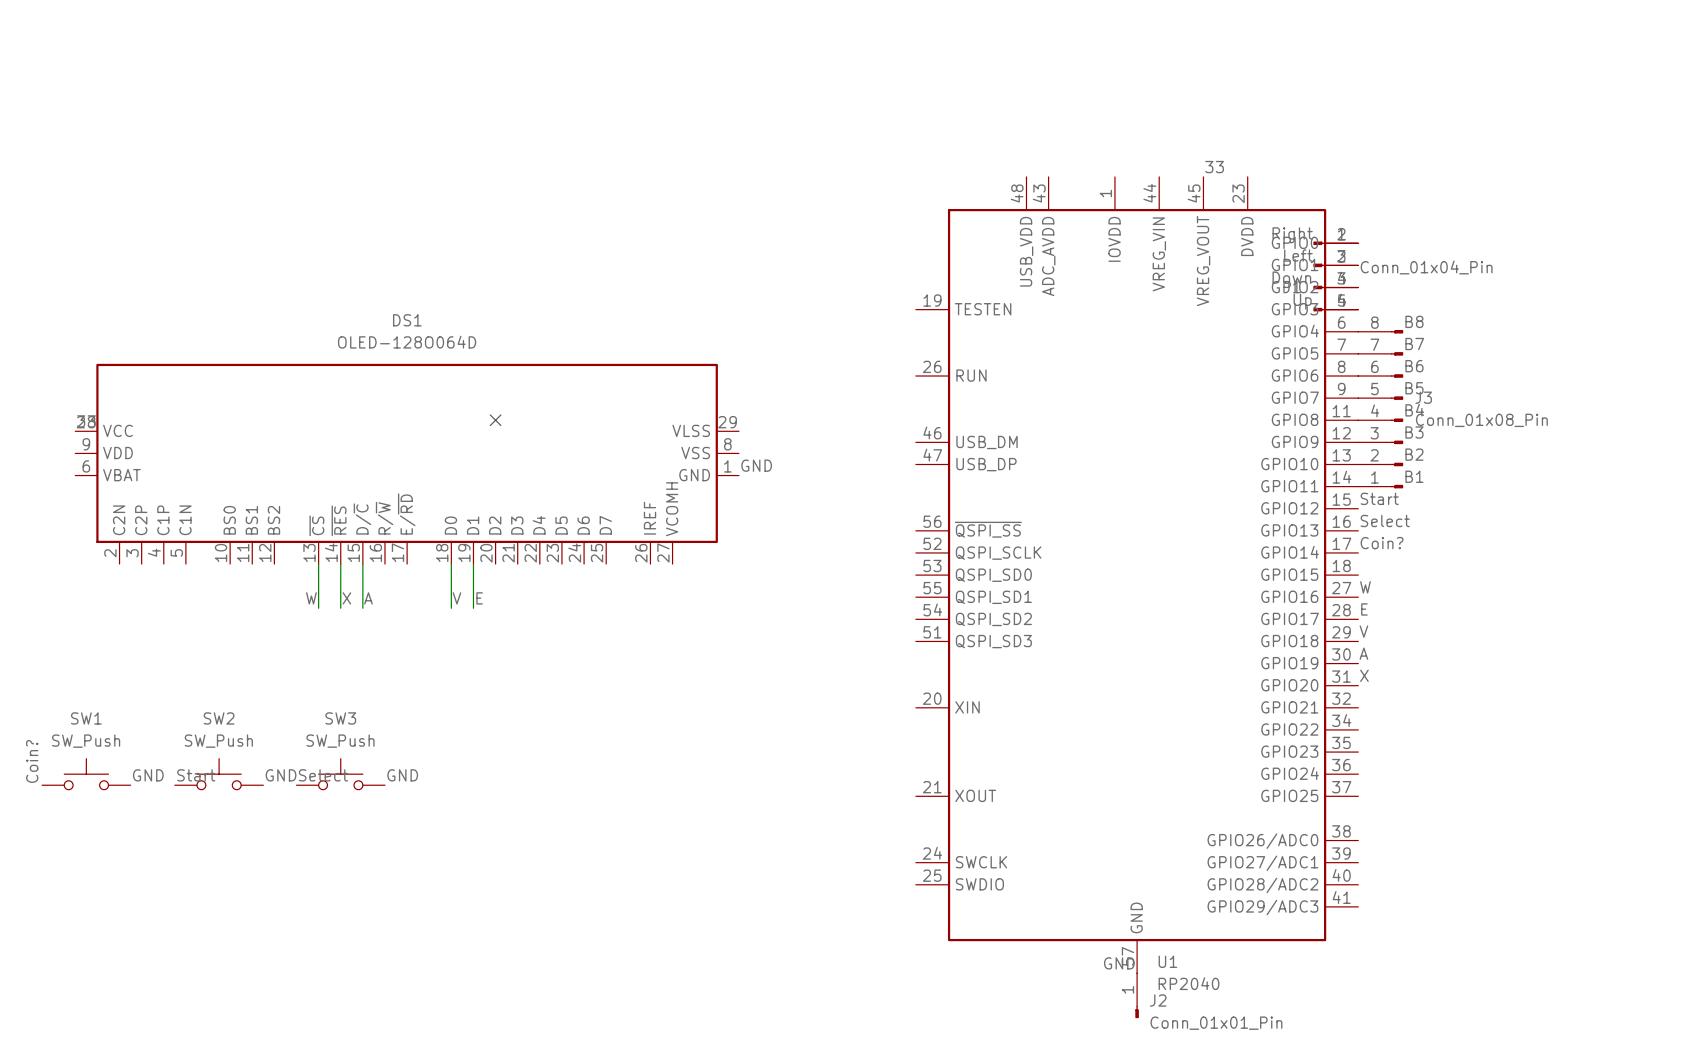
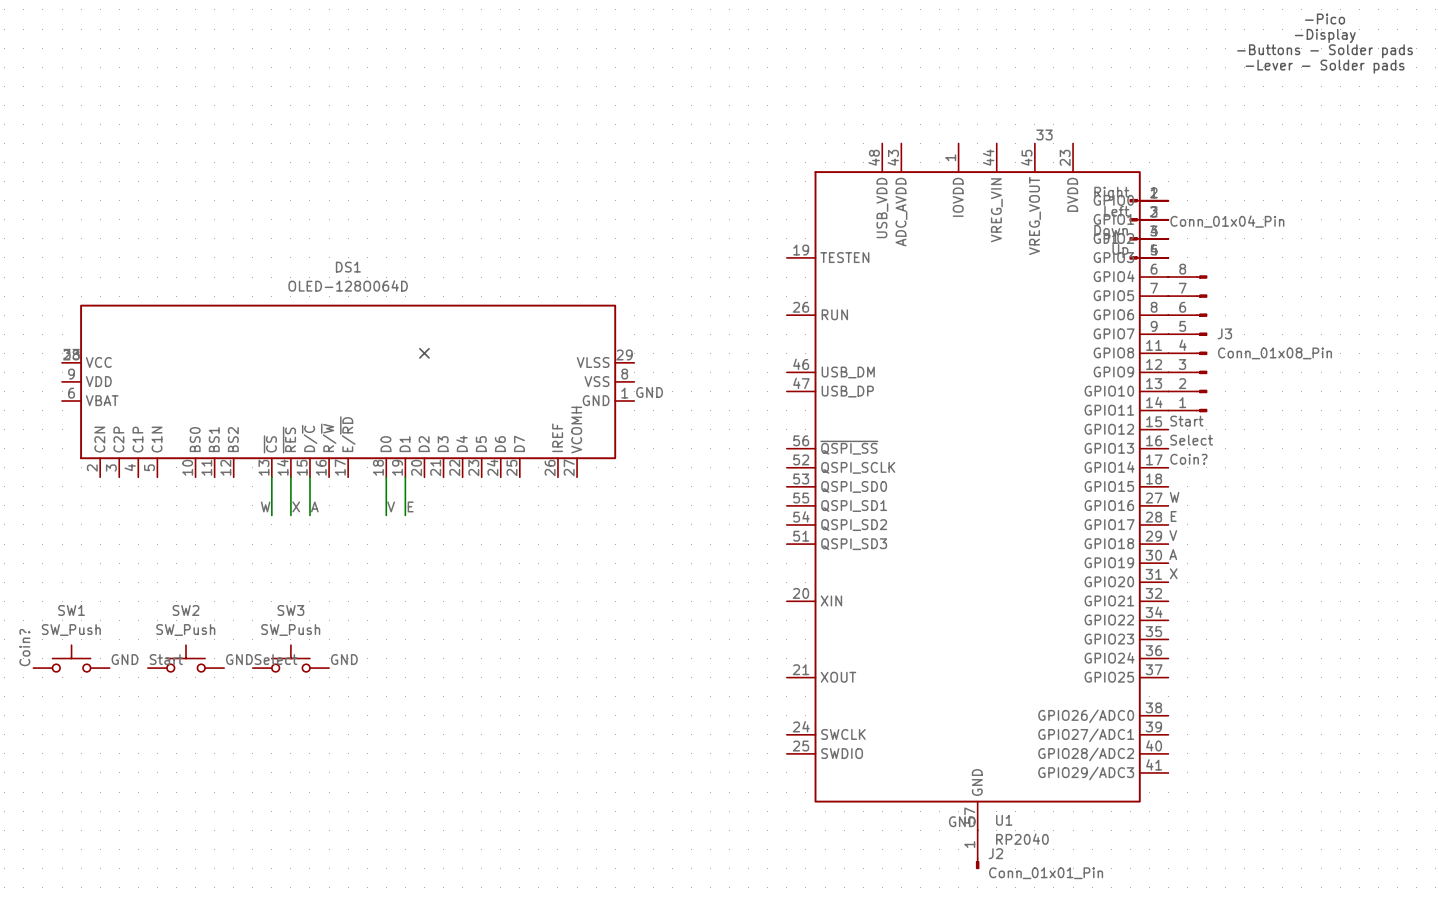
text: none -> -Pico (1325, 19)
text: none -> -Display (1325, 35)
text: none -> -Buttons - Solder pads (1325, 51)
text: none -> -Lever - Solder pads (1325, 66)
label: B8 (1414, 321) -> none
label: B7 (1414, 344) -> none
label: B6 (1414, 366) -> none
label: B5 (1414, 388) -> none
label: B4 (1414, 410) -> none
label: B3 (1414, 432) -> none
label: B2 (1414, 454) -> none
label: B1 (1414, 476) -> none

